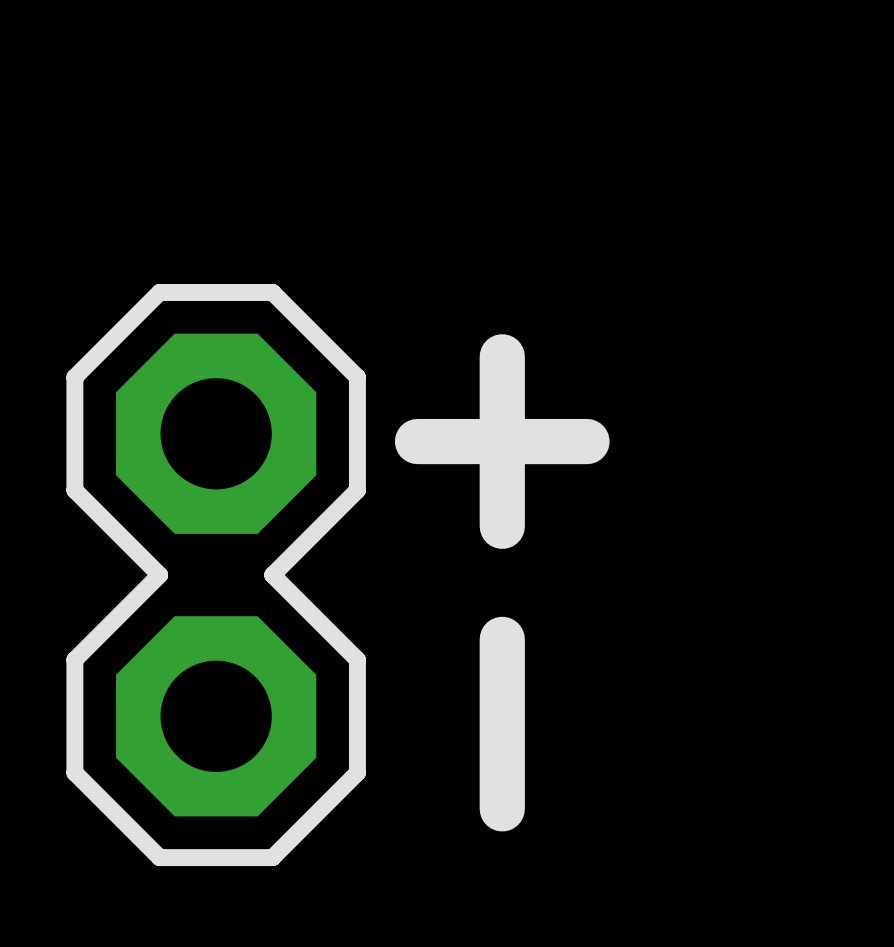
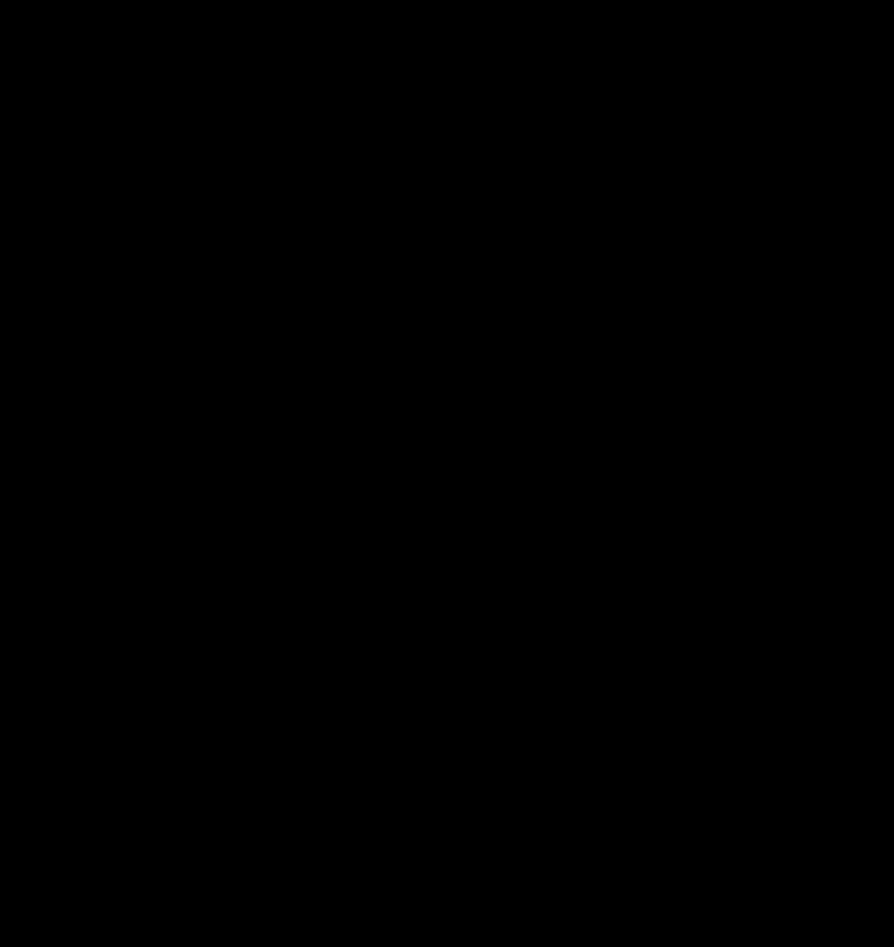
line: (502, 356) (502, 526) -> none
line: (417, 441) (587, 441) -> none
part: (216, 575) -> none
line: (502, 639) (502, 808) -> none

